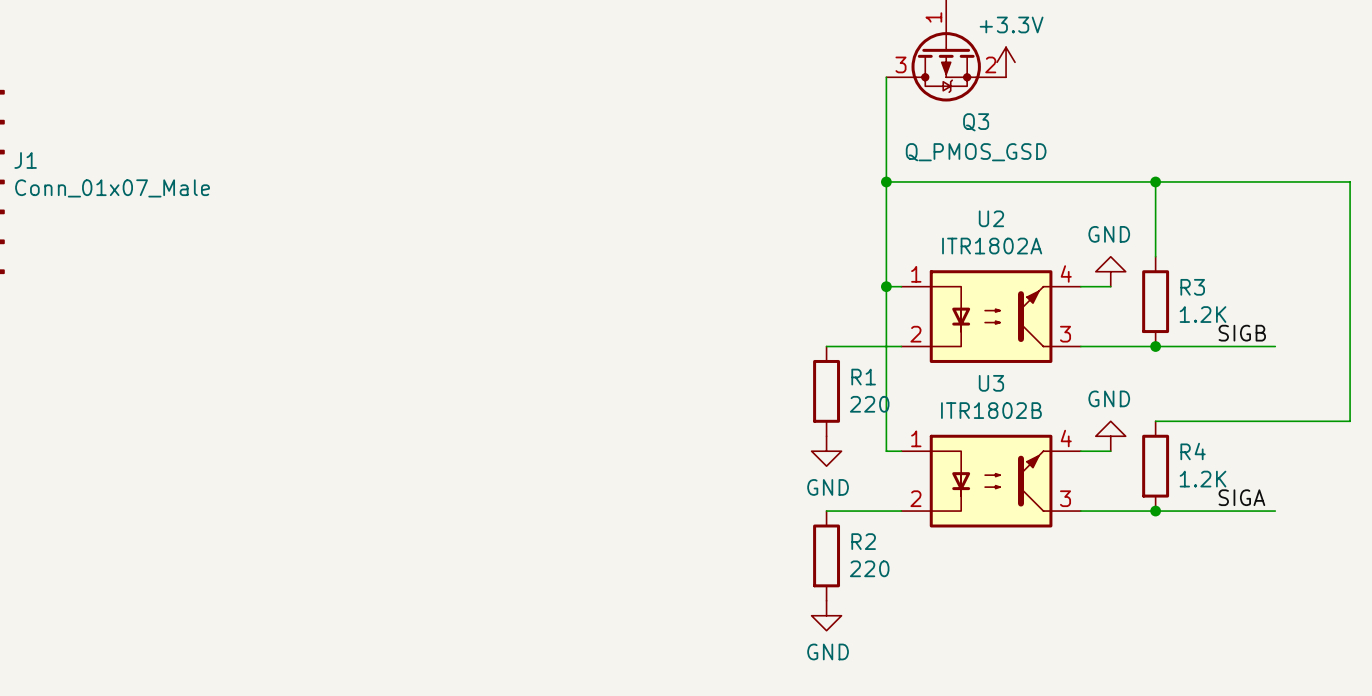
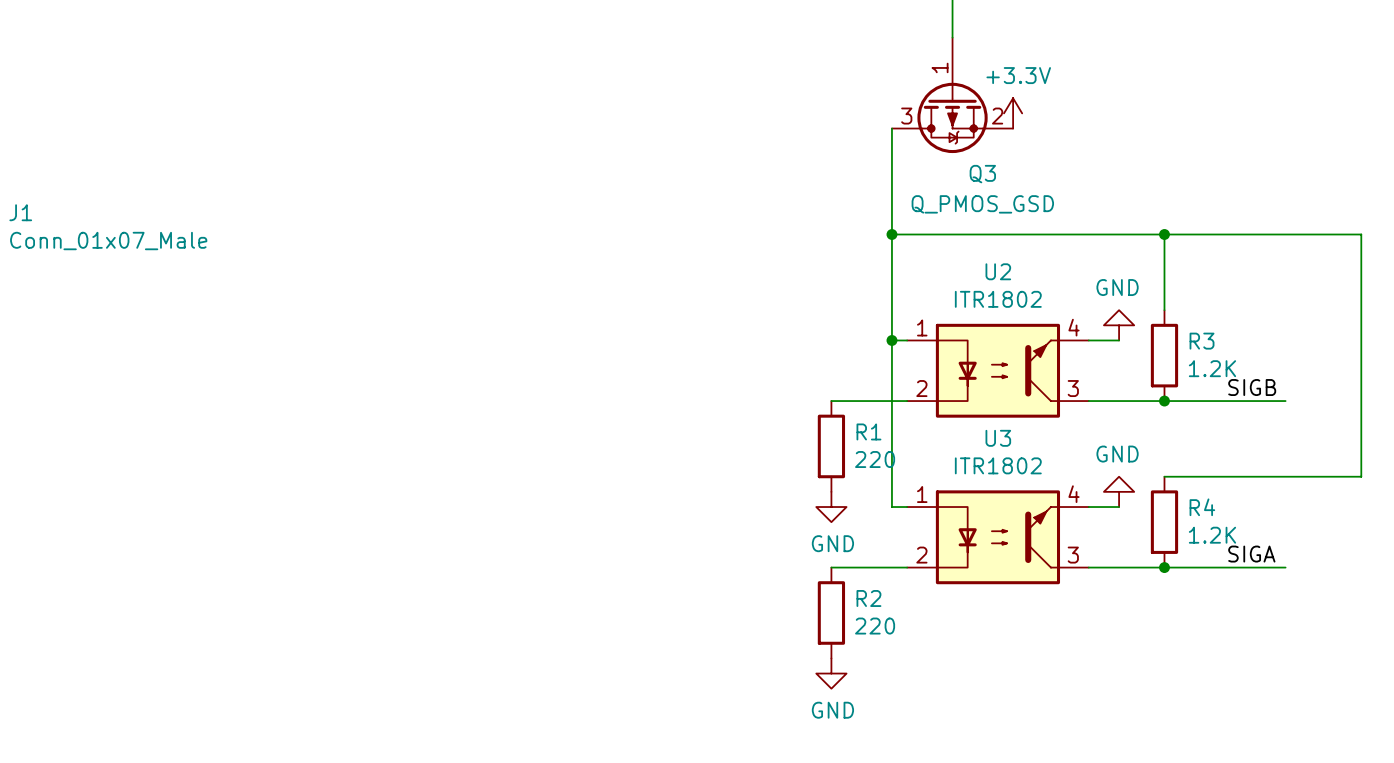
U2 value: ITR1802A (992, 246) -> ITR1802 (998, 299)
U3 value: ITR1802B (991, 410) -> ITR1802 (998, 465)

